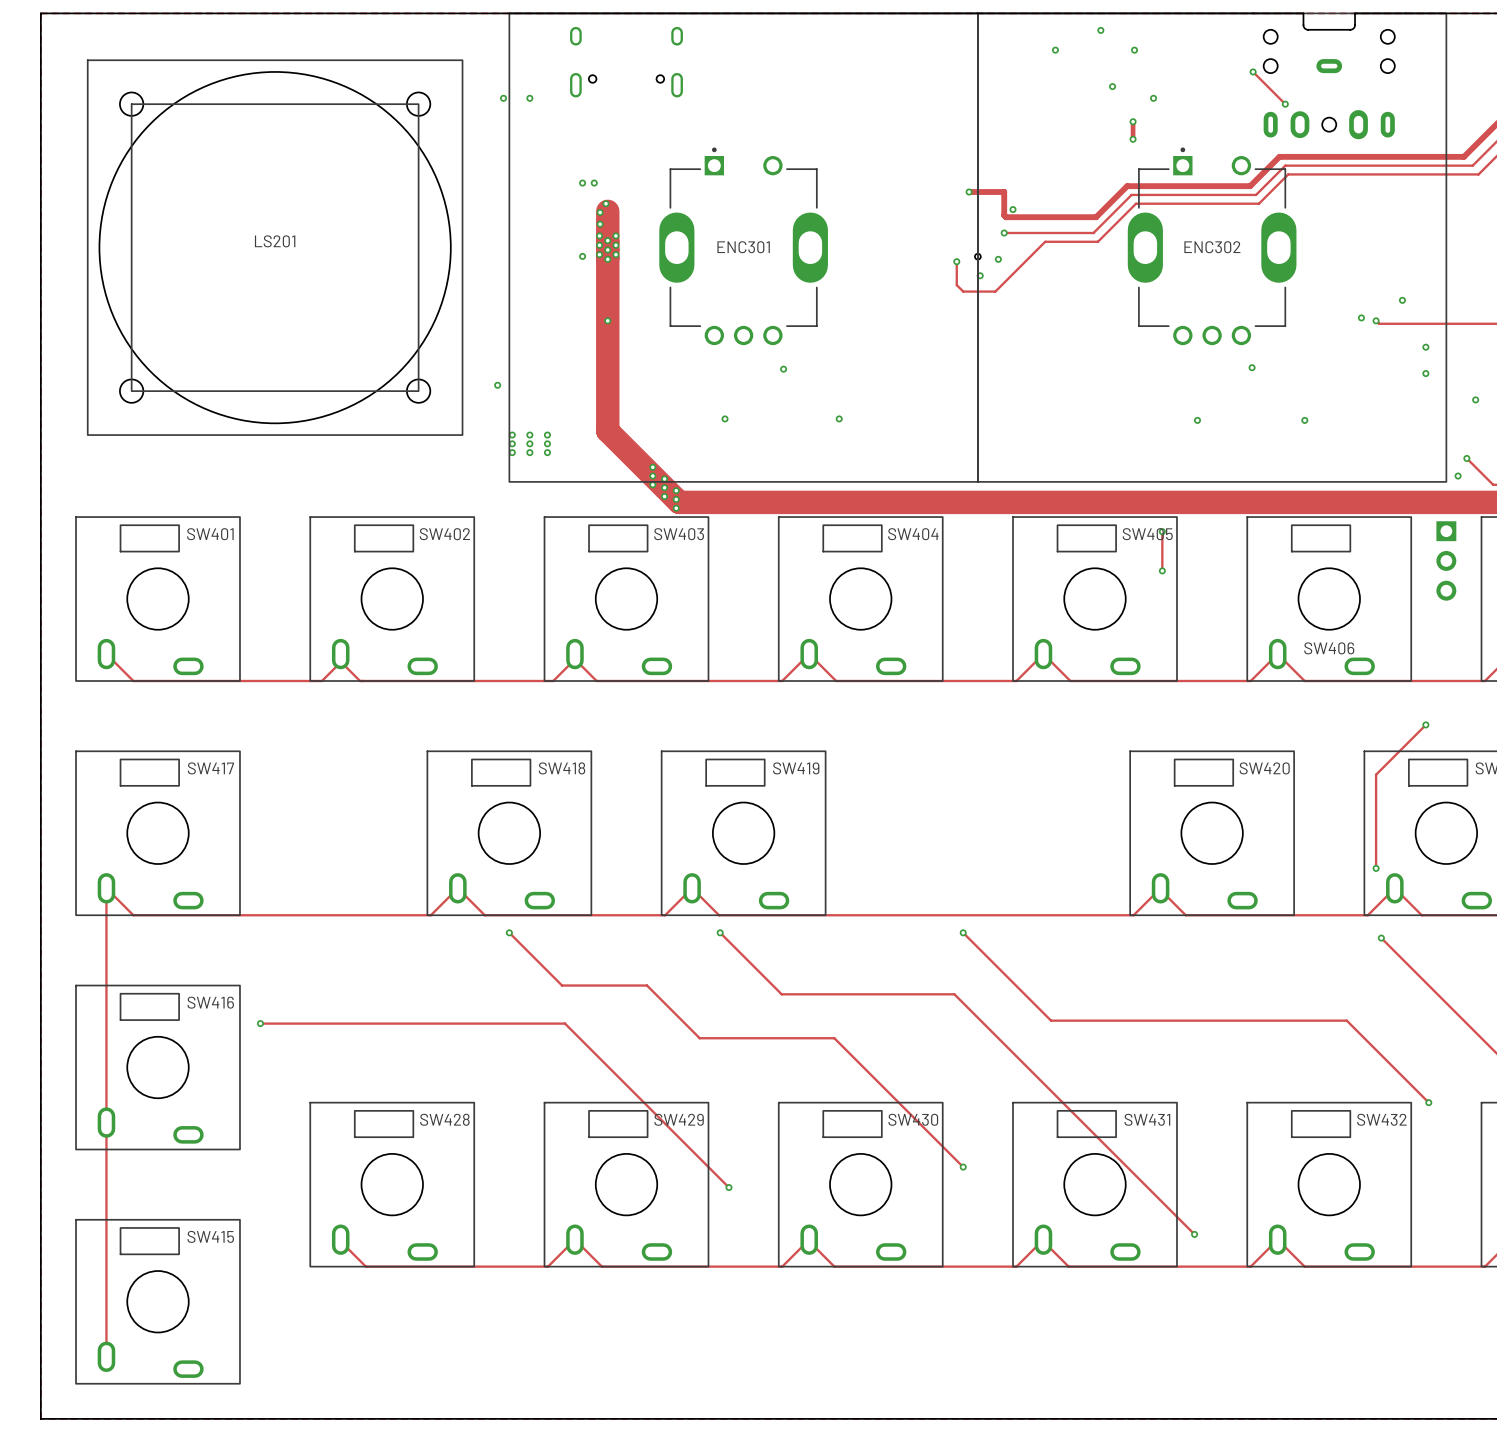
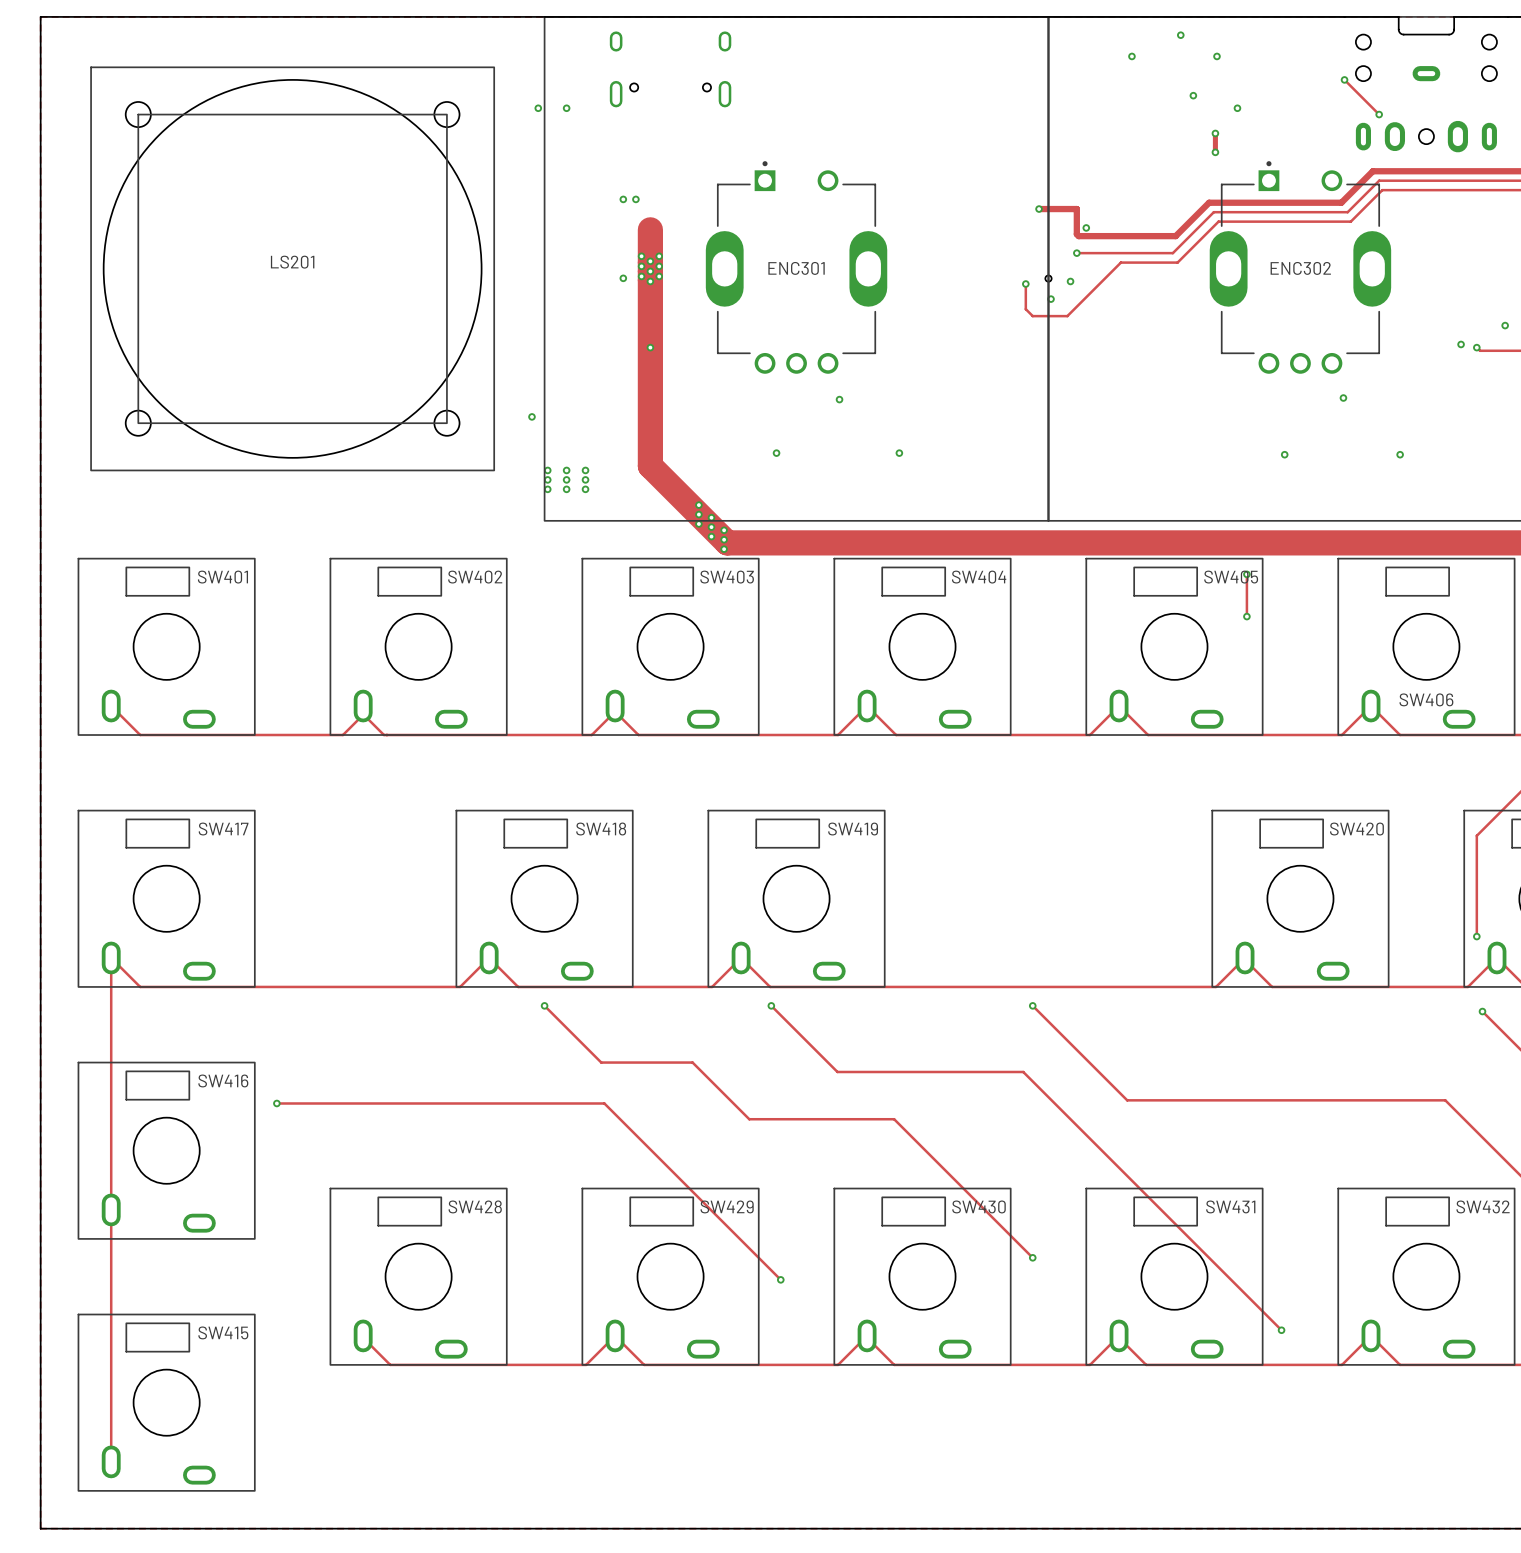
via: (606, 203) -> none
via: (600, 212) -> none
via: (600, 224) -> none

